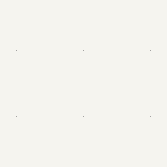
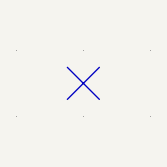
no-connect mark: none -> (83, 83)

